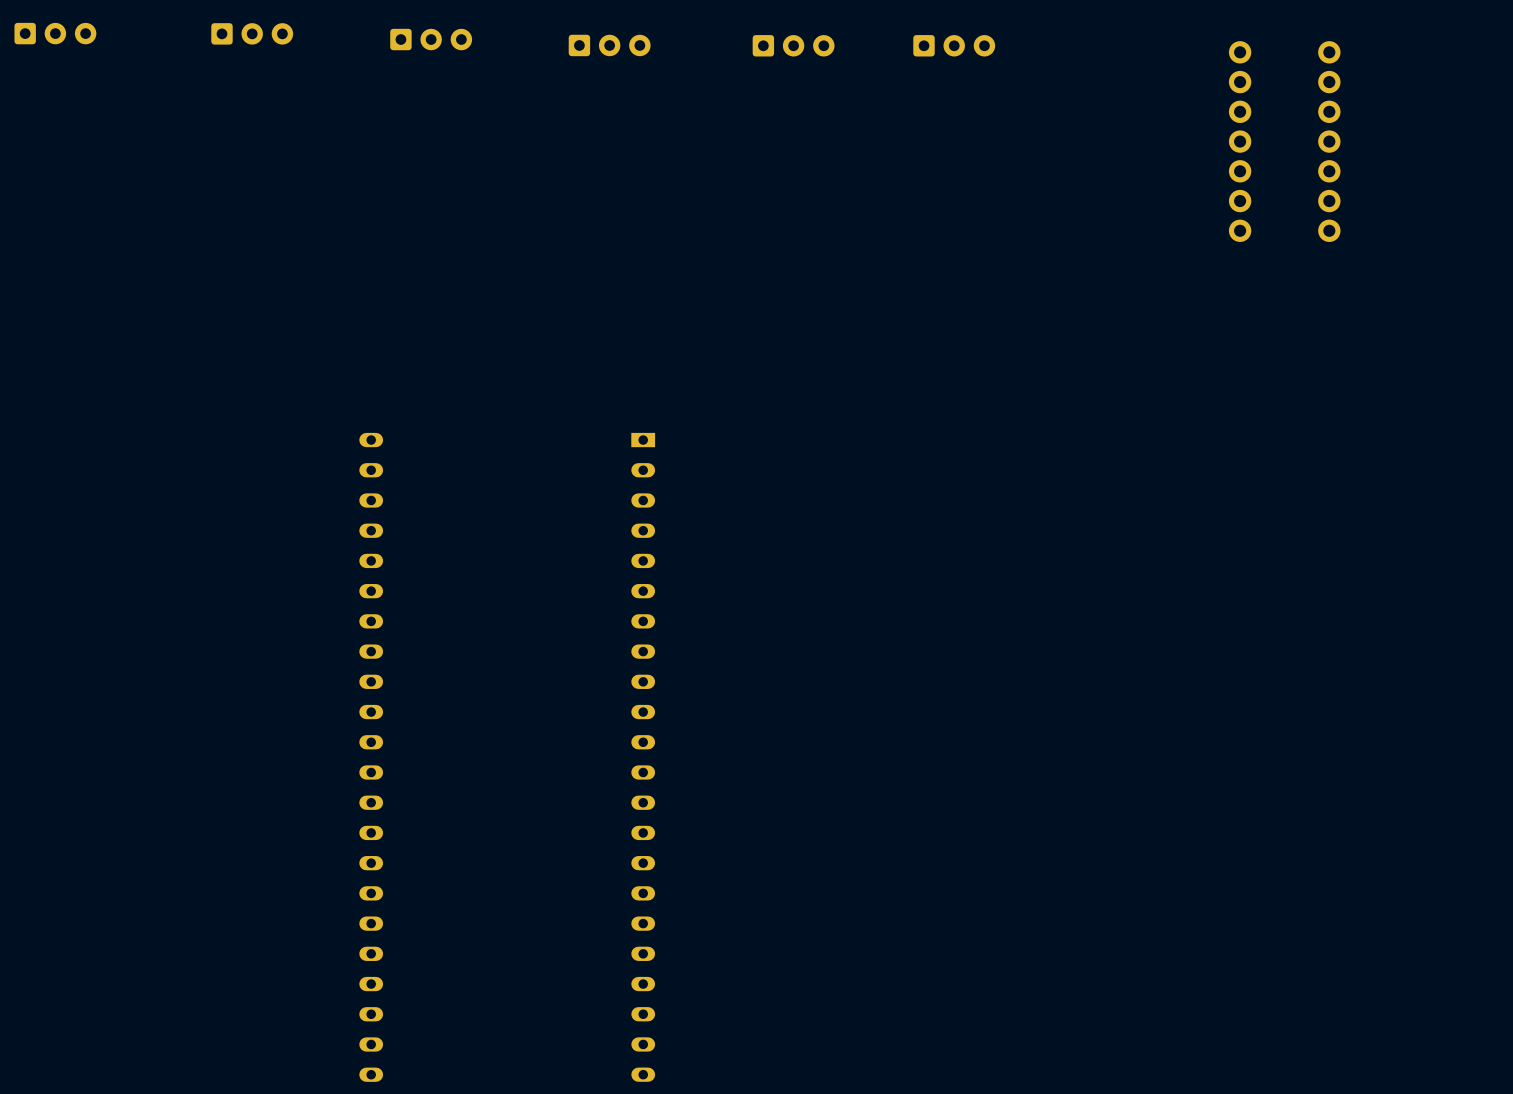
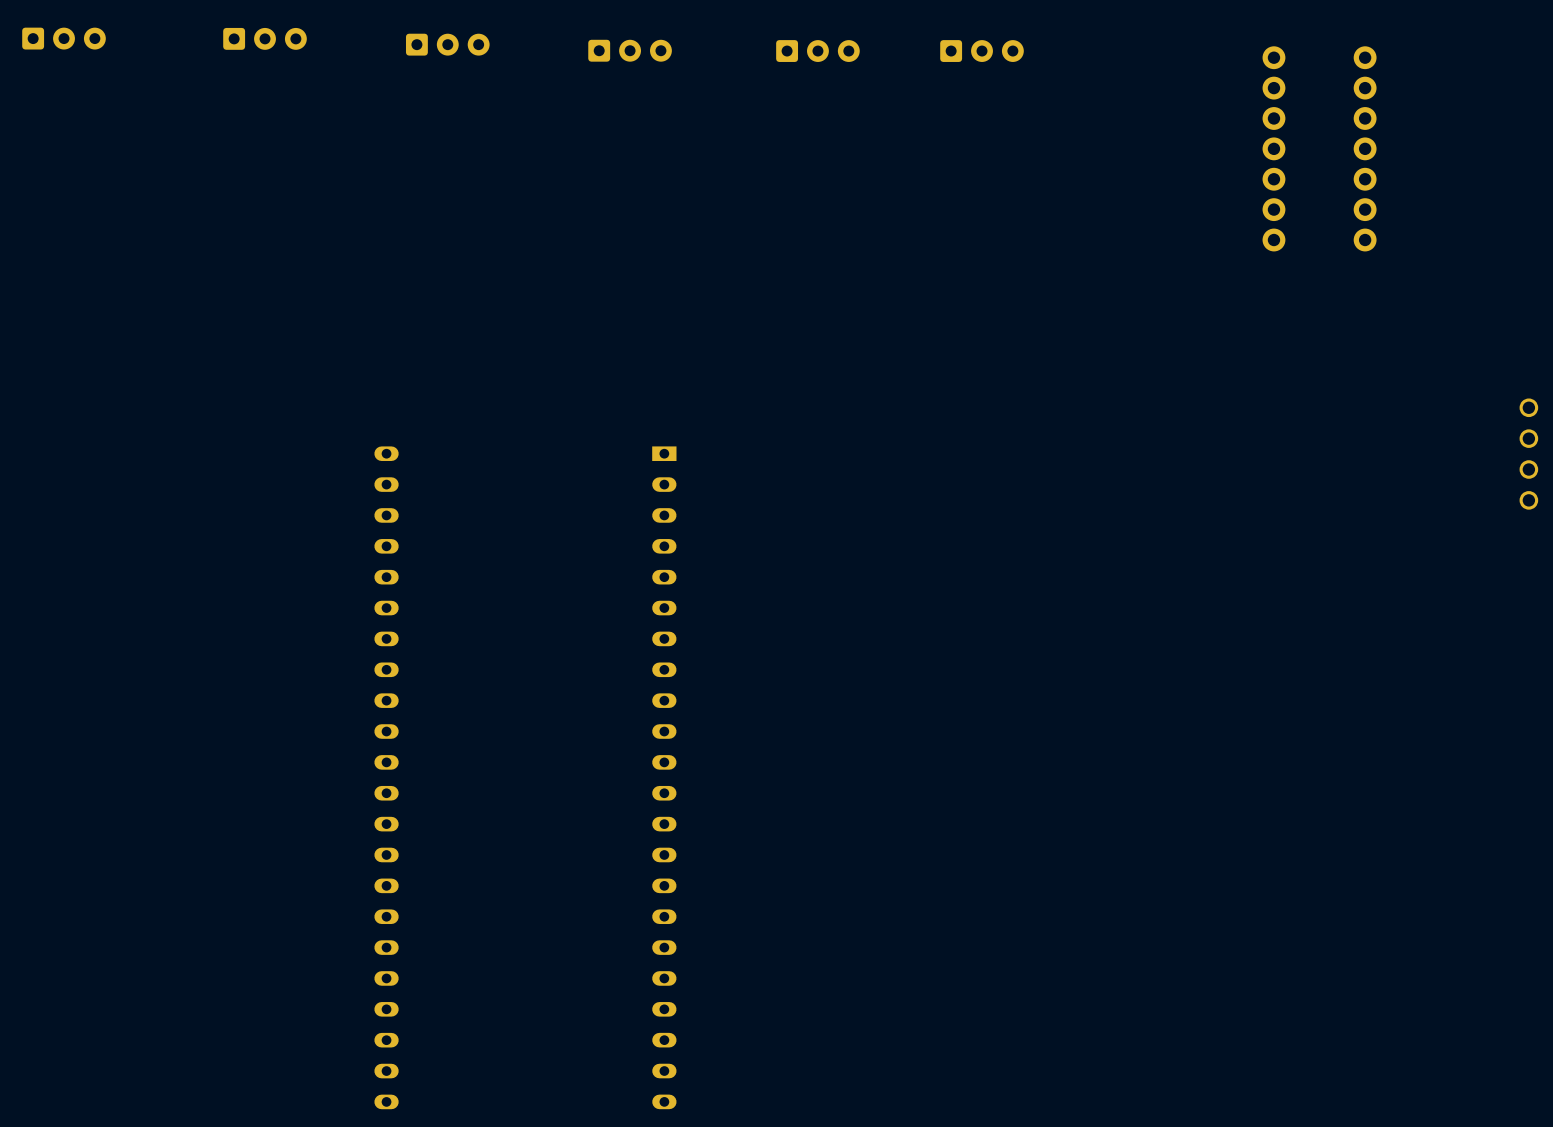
part: none -> (1528, 454)

